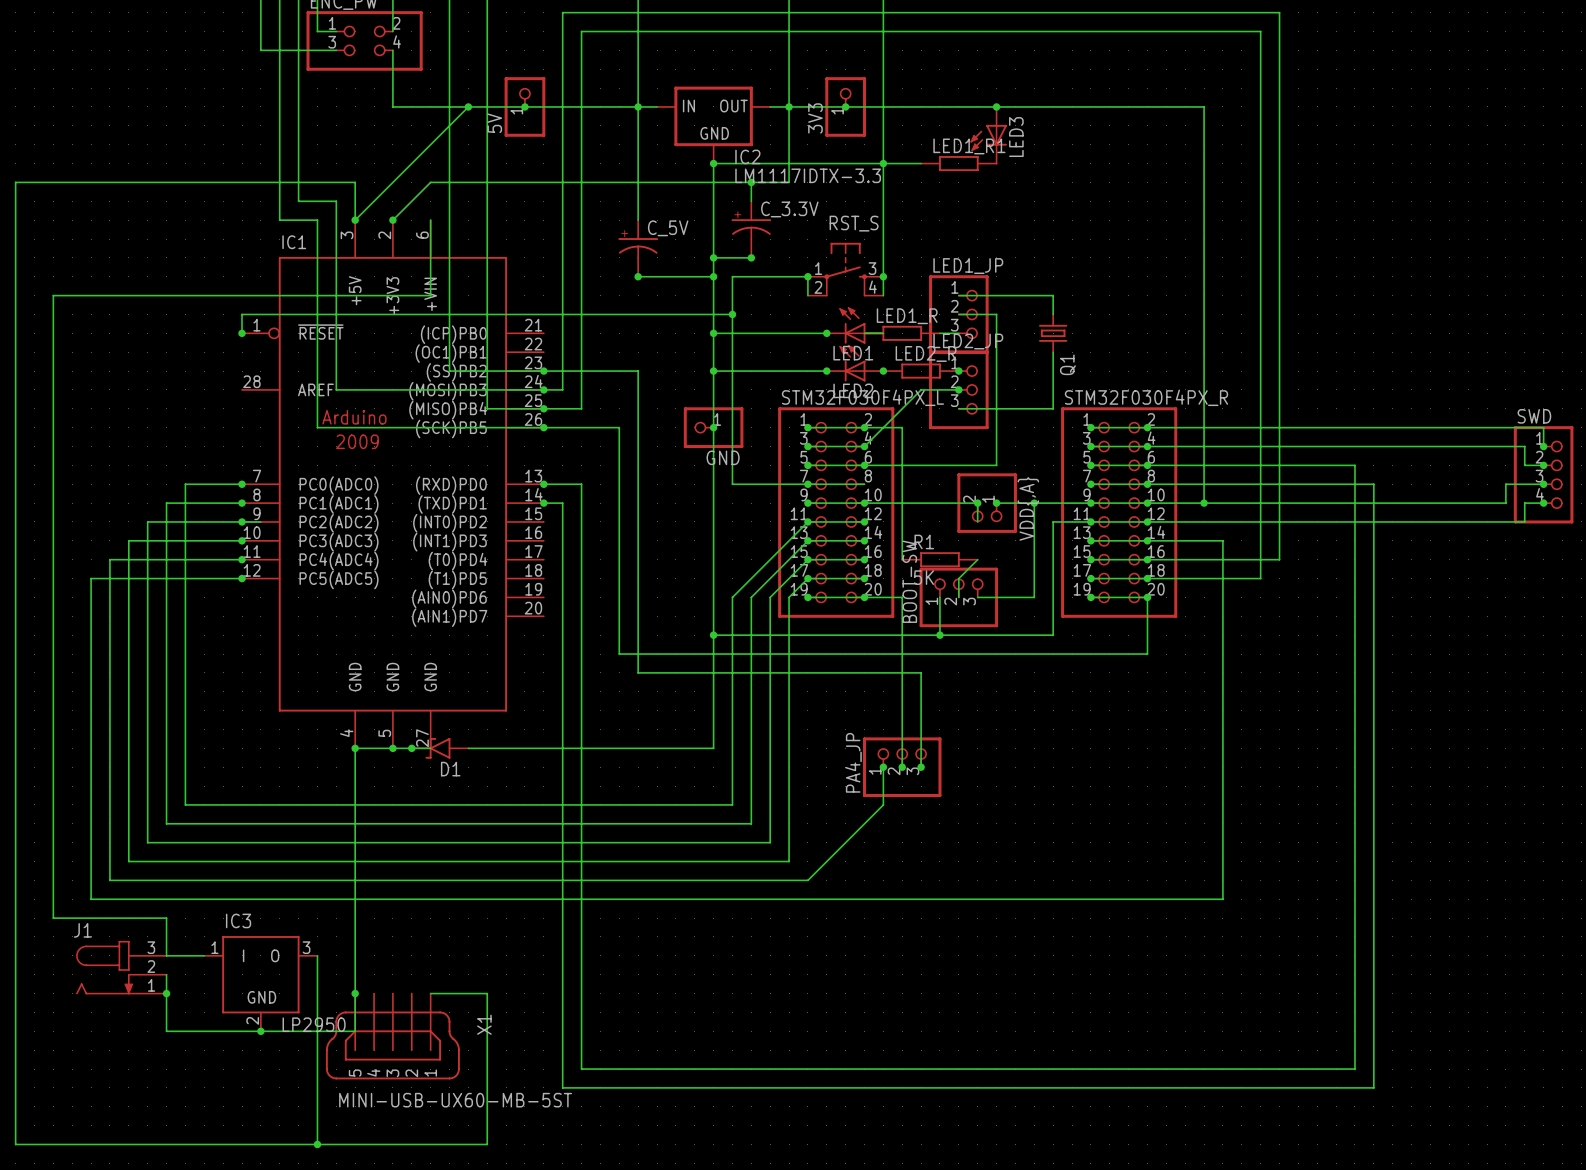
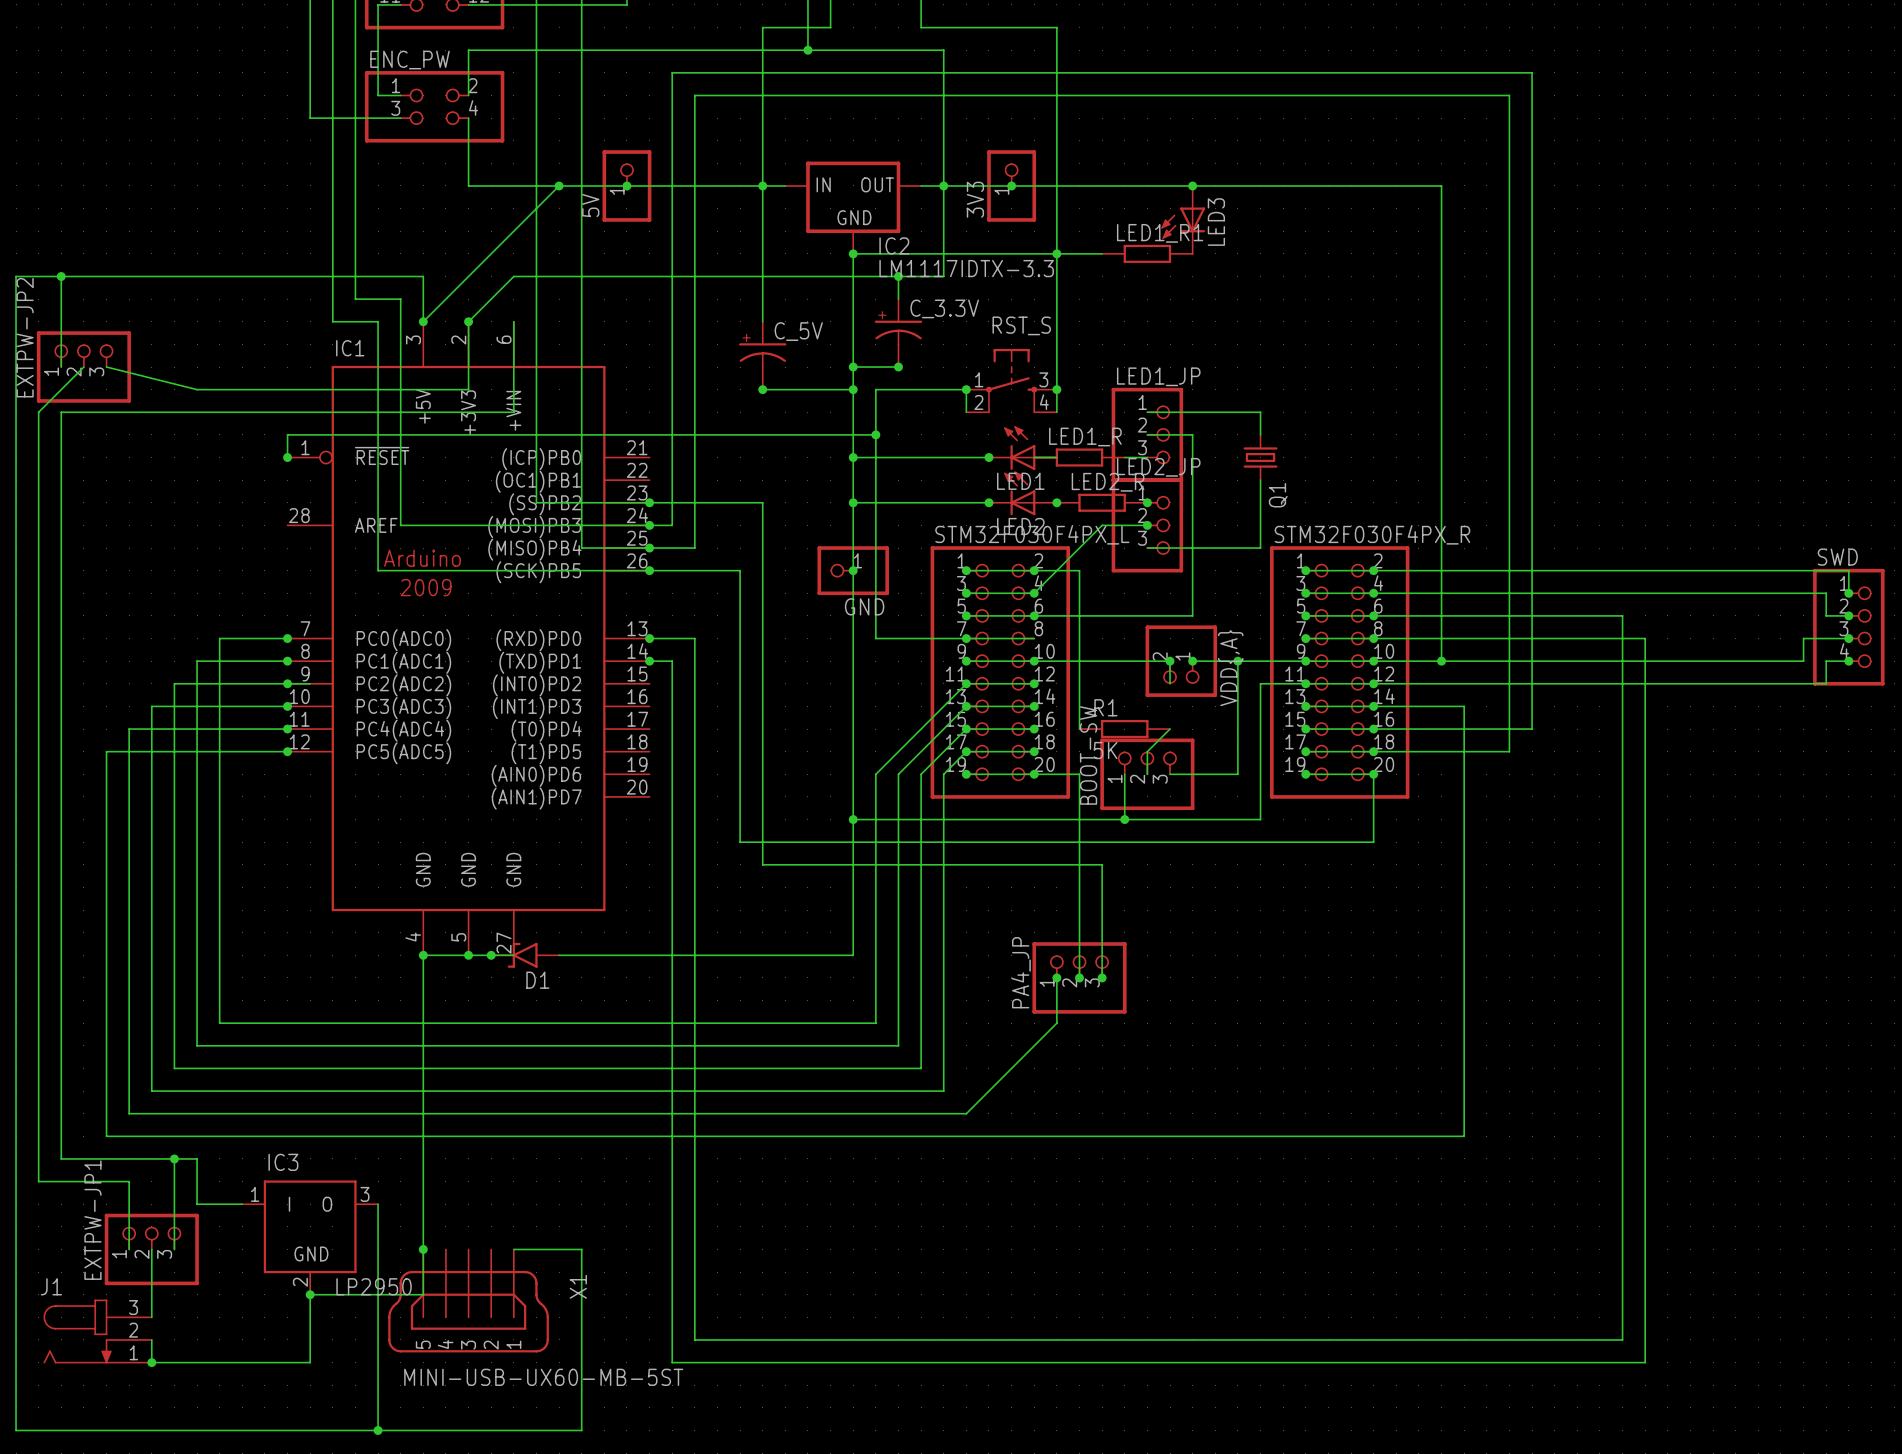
wire: none -> (61, 276) (61, 367)
junction: none -> (61, 276)
wire: none -> (468, 321) (468, 389) (197, 389) (106, 367)
wire: none -> (83, 367) (38, 412) (38, 1181) (129, 1181) (129, 1249)
EXTPW-JP2: none -> (83, 367)
wire: none -> (174, 1158) (174, 1249)
junction: none -> (174, 1158)
J1 position: (121, 967) -> (97, 1331)
wire: (166, 974) (166, 1031) (260, 1031) -> (151, 1339) (151, 1362) (310, 1362) (310, 1294)
wire: none -> (151, 1249) (151, 1317)
EXTPW-JP1: none -> (151, 1249)
junction: (166, 993) -> none
junction: none -> (151, 1362)

